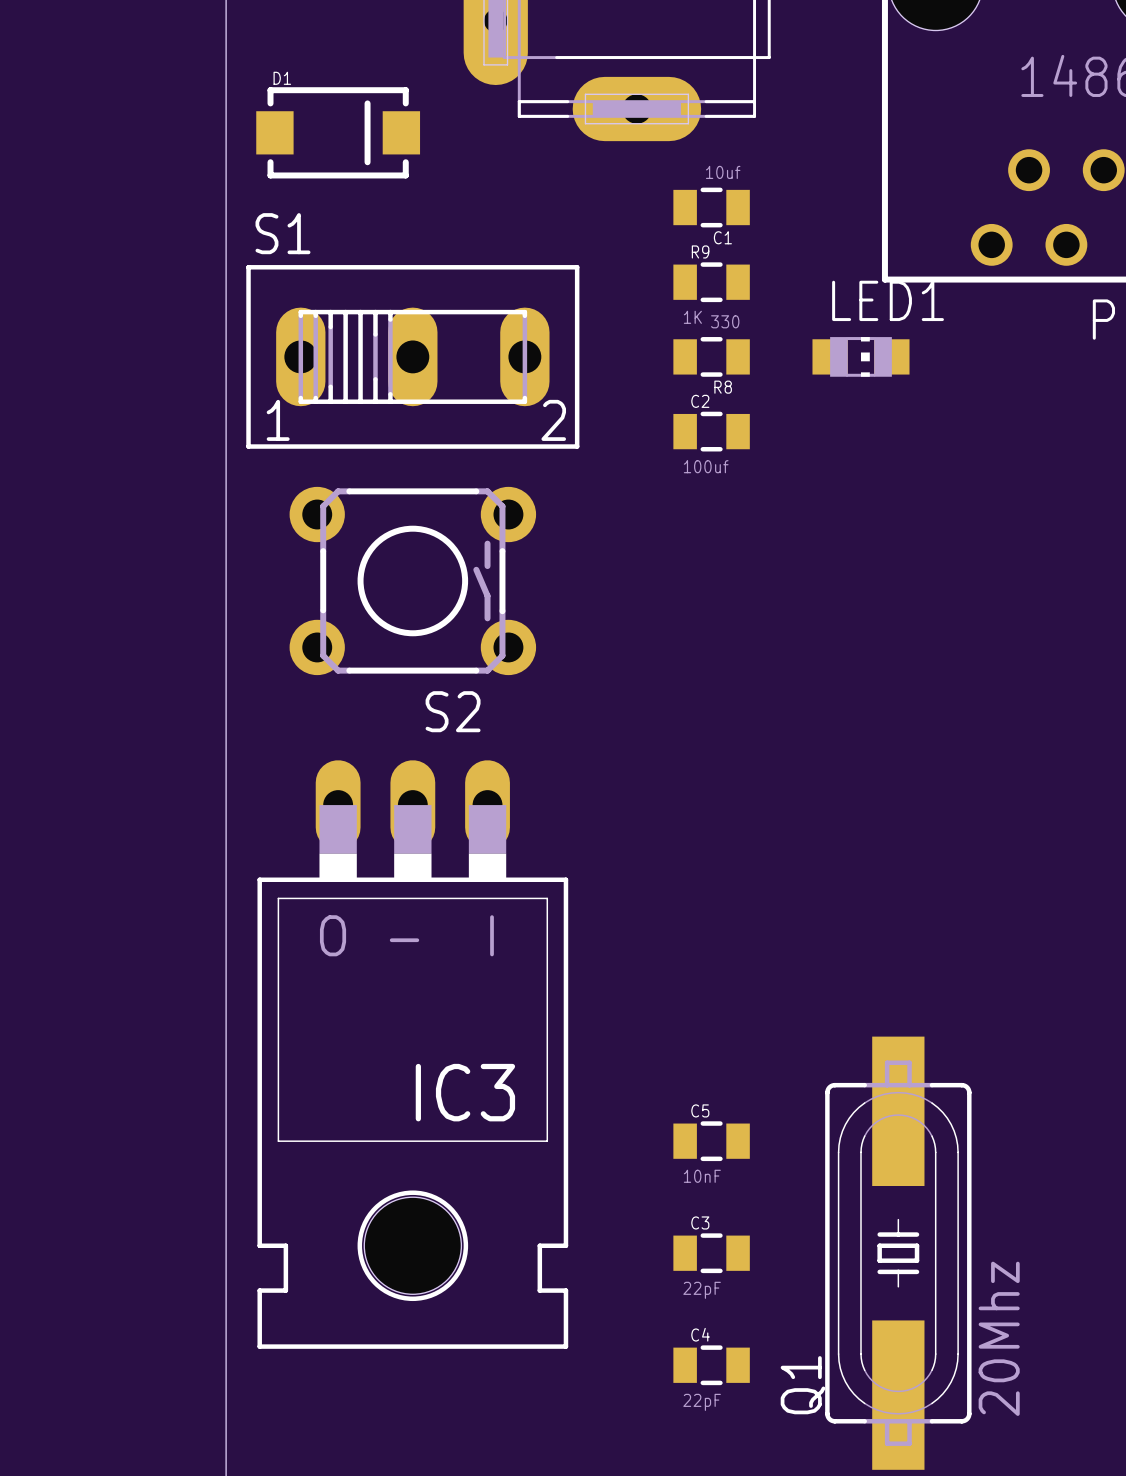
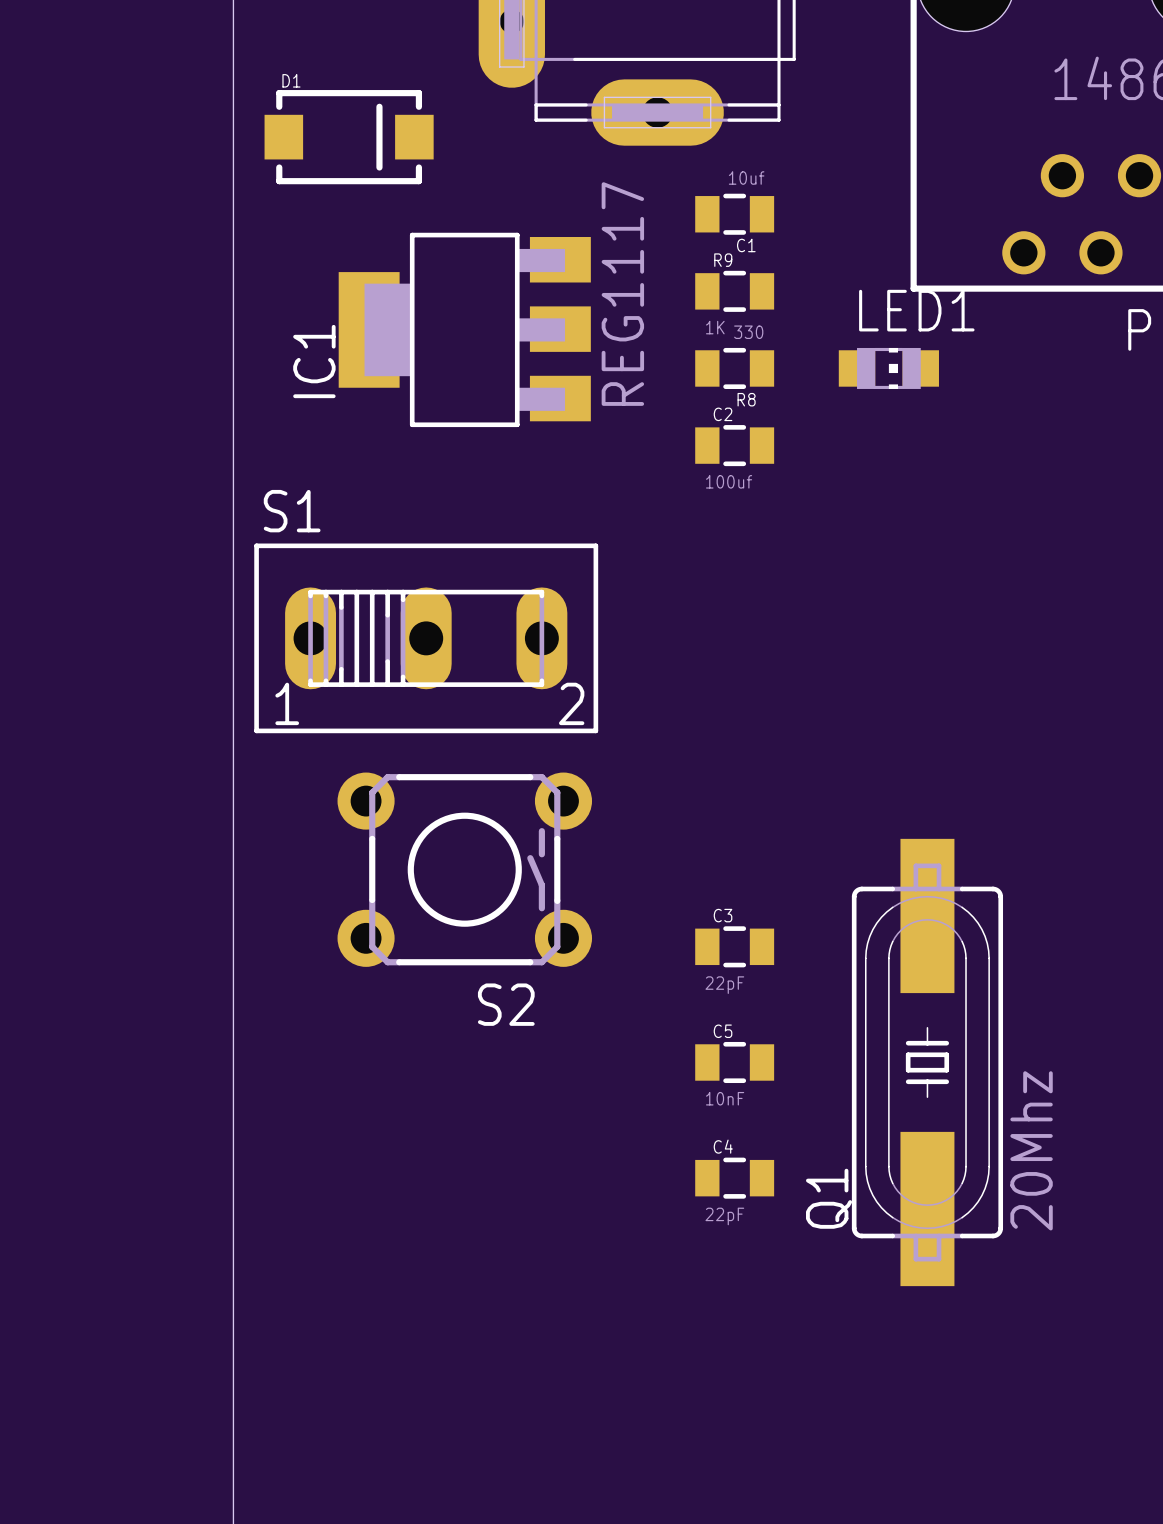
IC1: none -> REG1117 (464, 329)
S1 position: (412, 356) -> (426, 638)
S2 position: (412, 580) -> (464, 869)
C5: none -> 10nF (734, 1062)
IC3: (412, 1054) -> none
C5 name: C5 (700, 1110) -> C4 (723, 1146)
C5 value: 10nF (702, 1176) -> 22pF (724, 1216)
C3 position: (711, 1253) -> (734, 946)
Q1 position: (898, 1253) -> (927, 1062)
C4: 22pF (711, 1365) -> none

